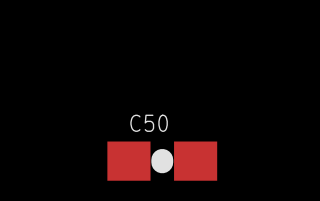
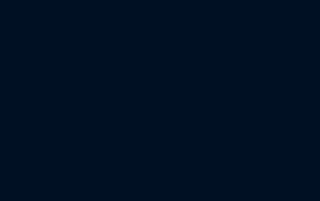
C50: (162, 161) -> none

